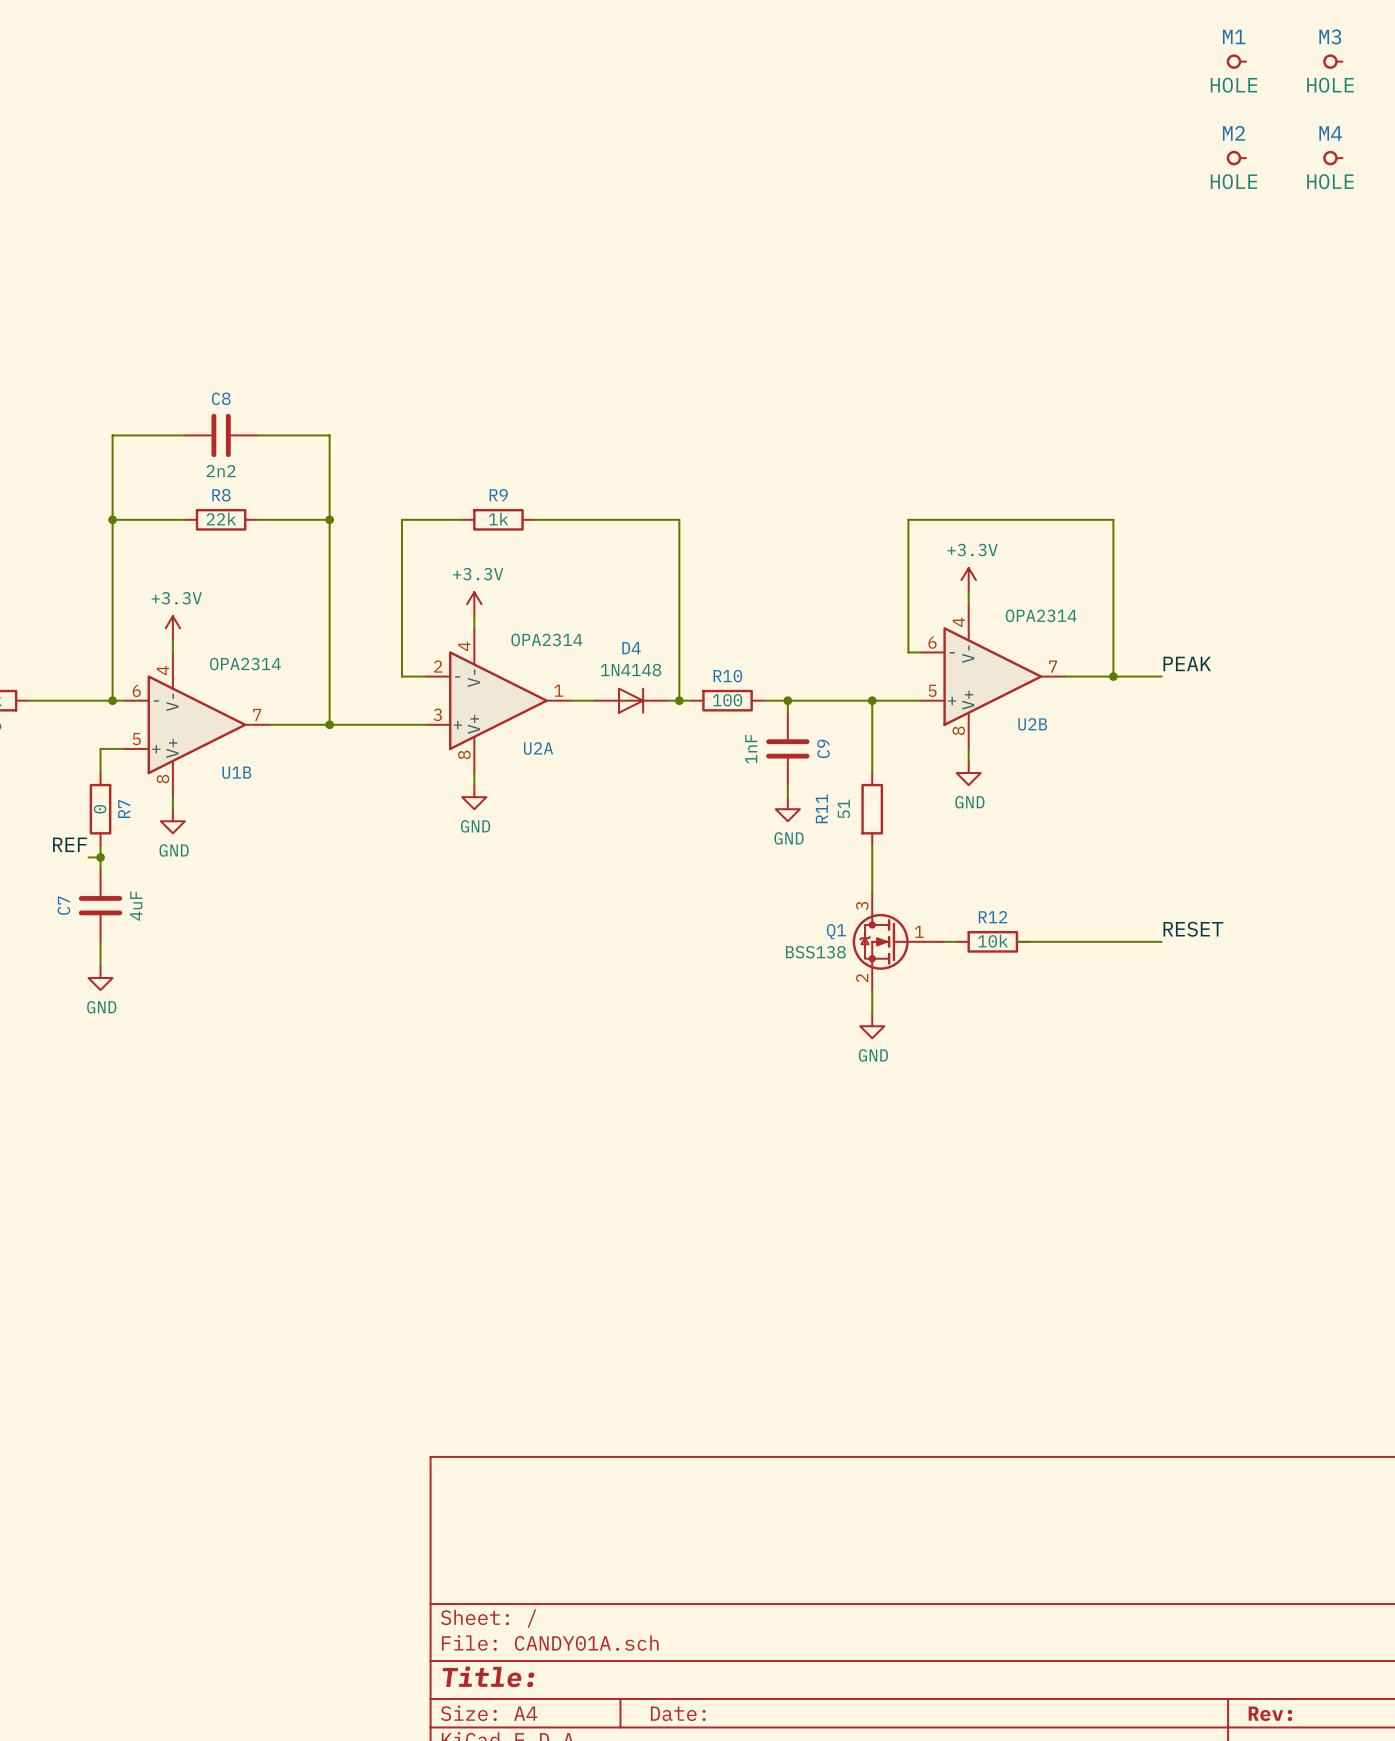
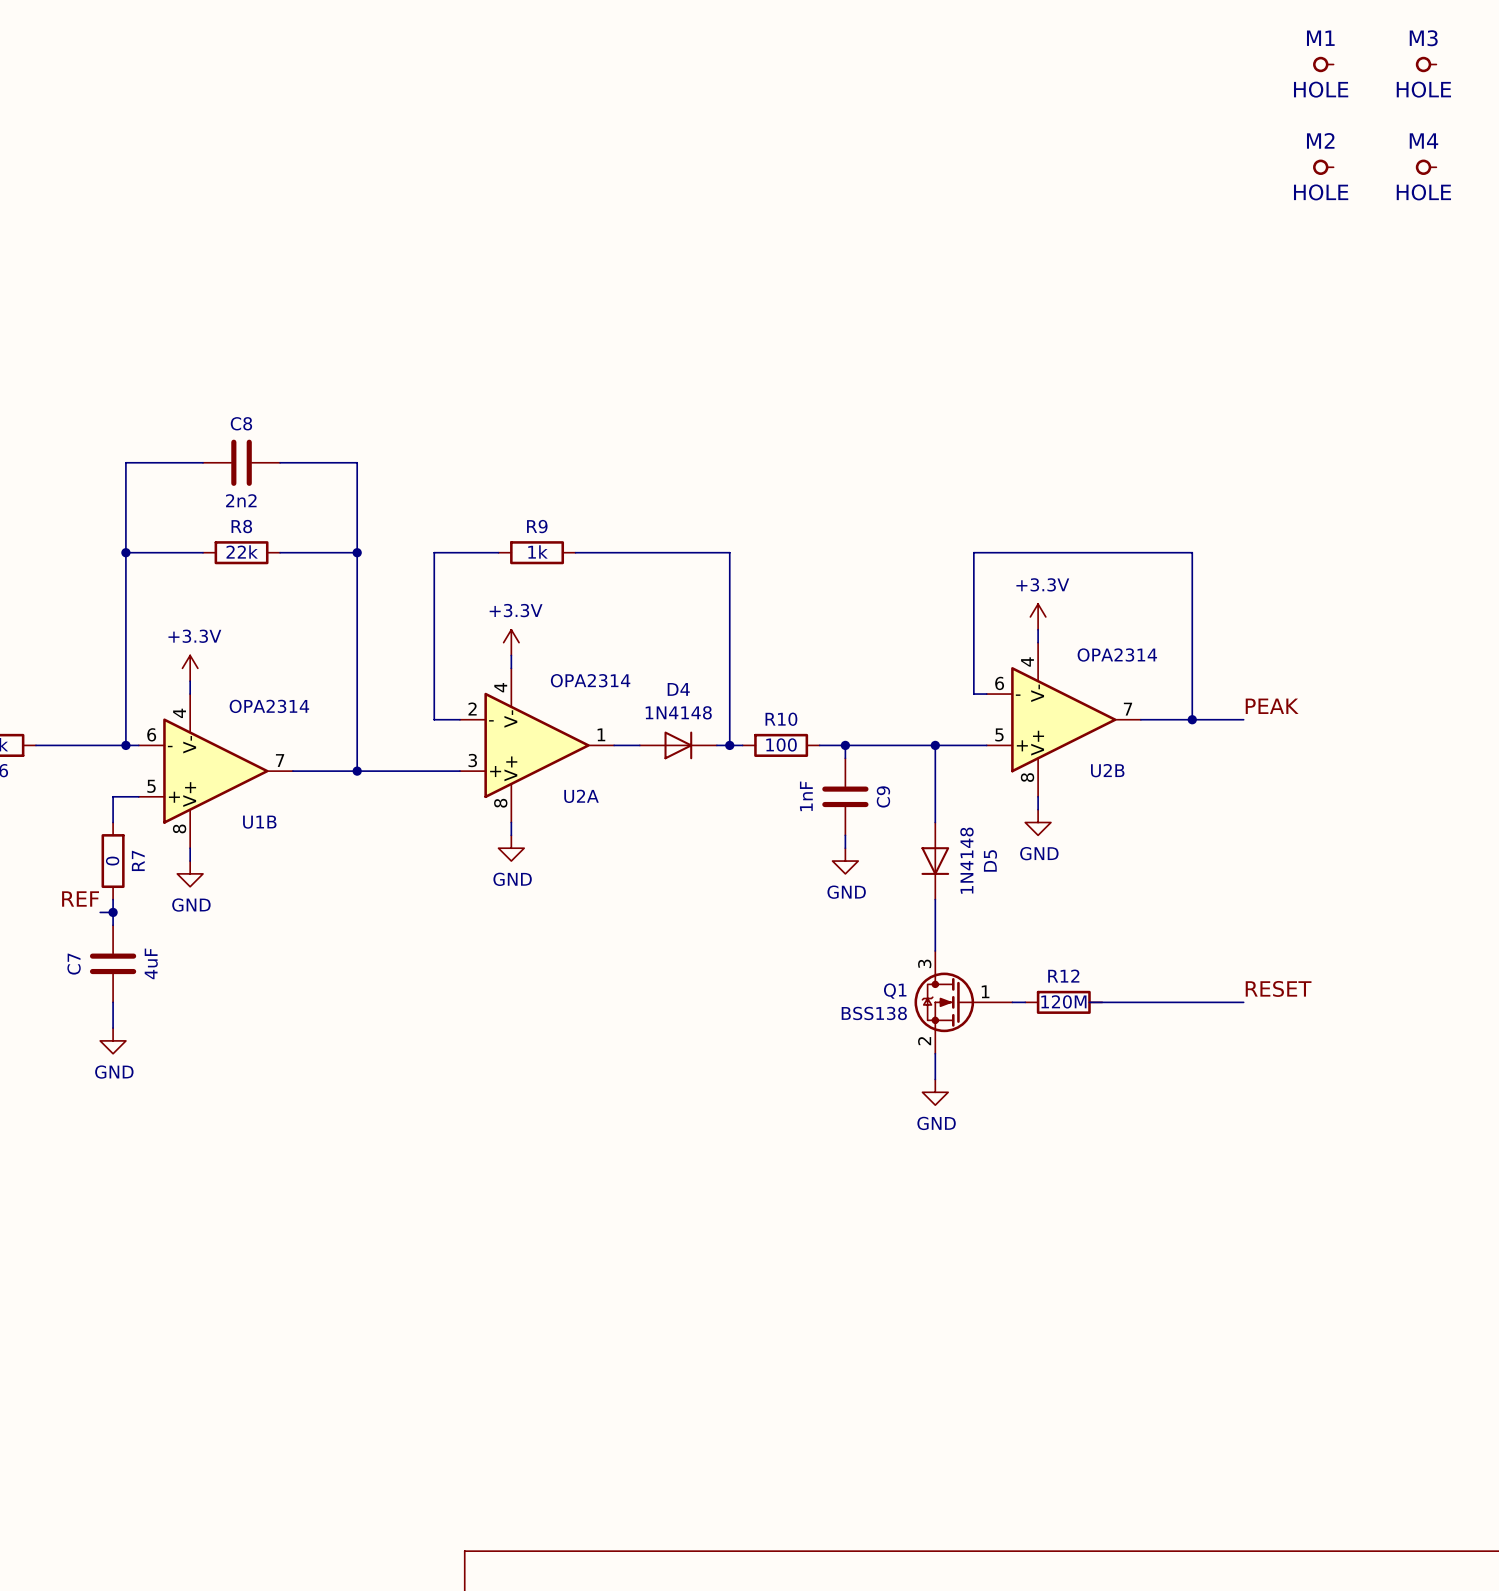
R11: 51 (872, 809) -> none
D5: none -> 1N4148 (935, 861)
R12 value: 10k (993, 941) -> 120M (1063, 1001)

